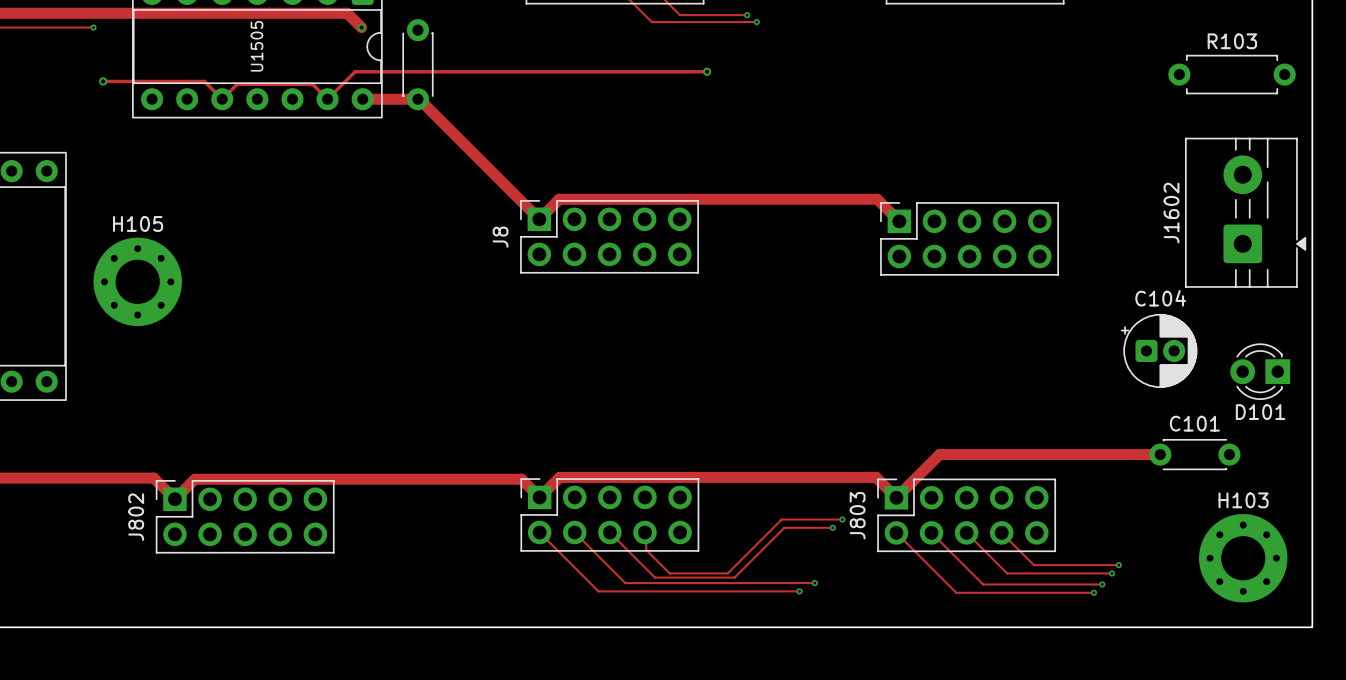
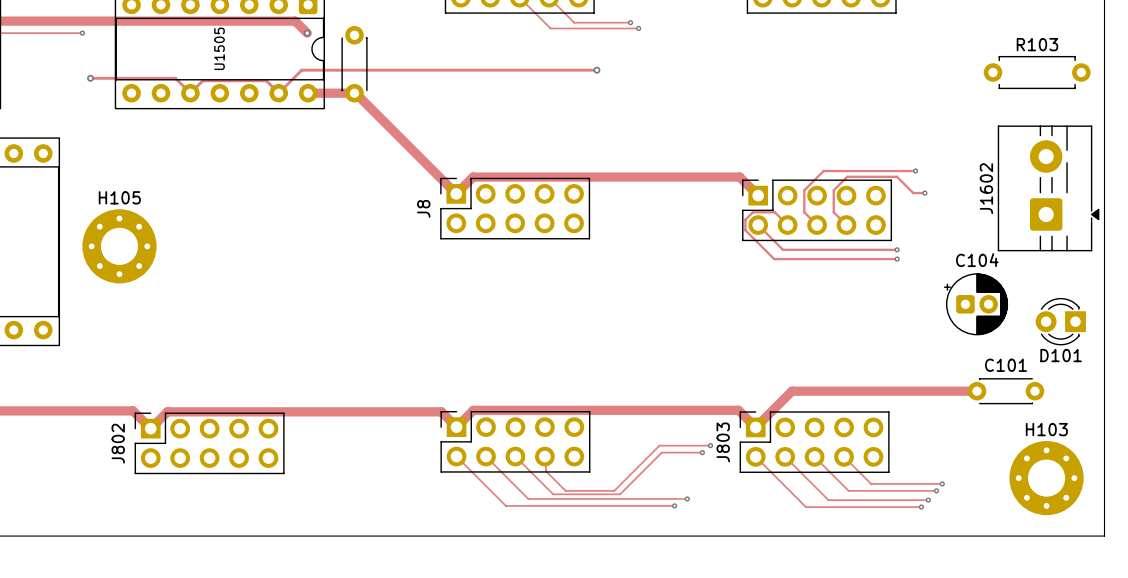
track: none -> (915, 171) (823, 171) (804, 190) (804, 212) (817, 225)
via: none -> (915, 171)
track: none -> (924, 193) (913, 193) (897, 176) (847, 176) (833, 190) (833, 212) (846, 225)
via: none -> (924, 193)
track: none -> (758, 225) (782, 249) (897, 249)
track: none -> (787, 225) (774, 212) (752, 212) (745, 219) (745, 230) (774, 259) (897, 259)
via: none -> (897, 249)
via: none -> (897, 259)

